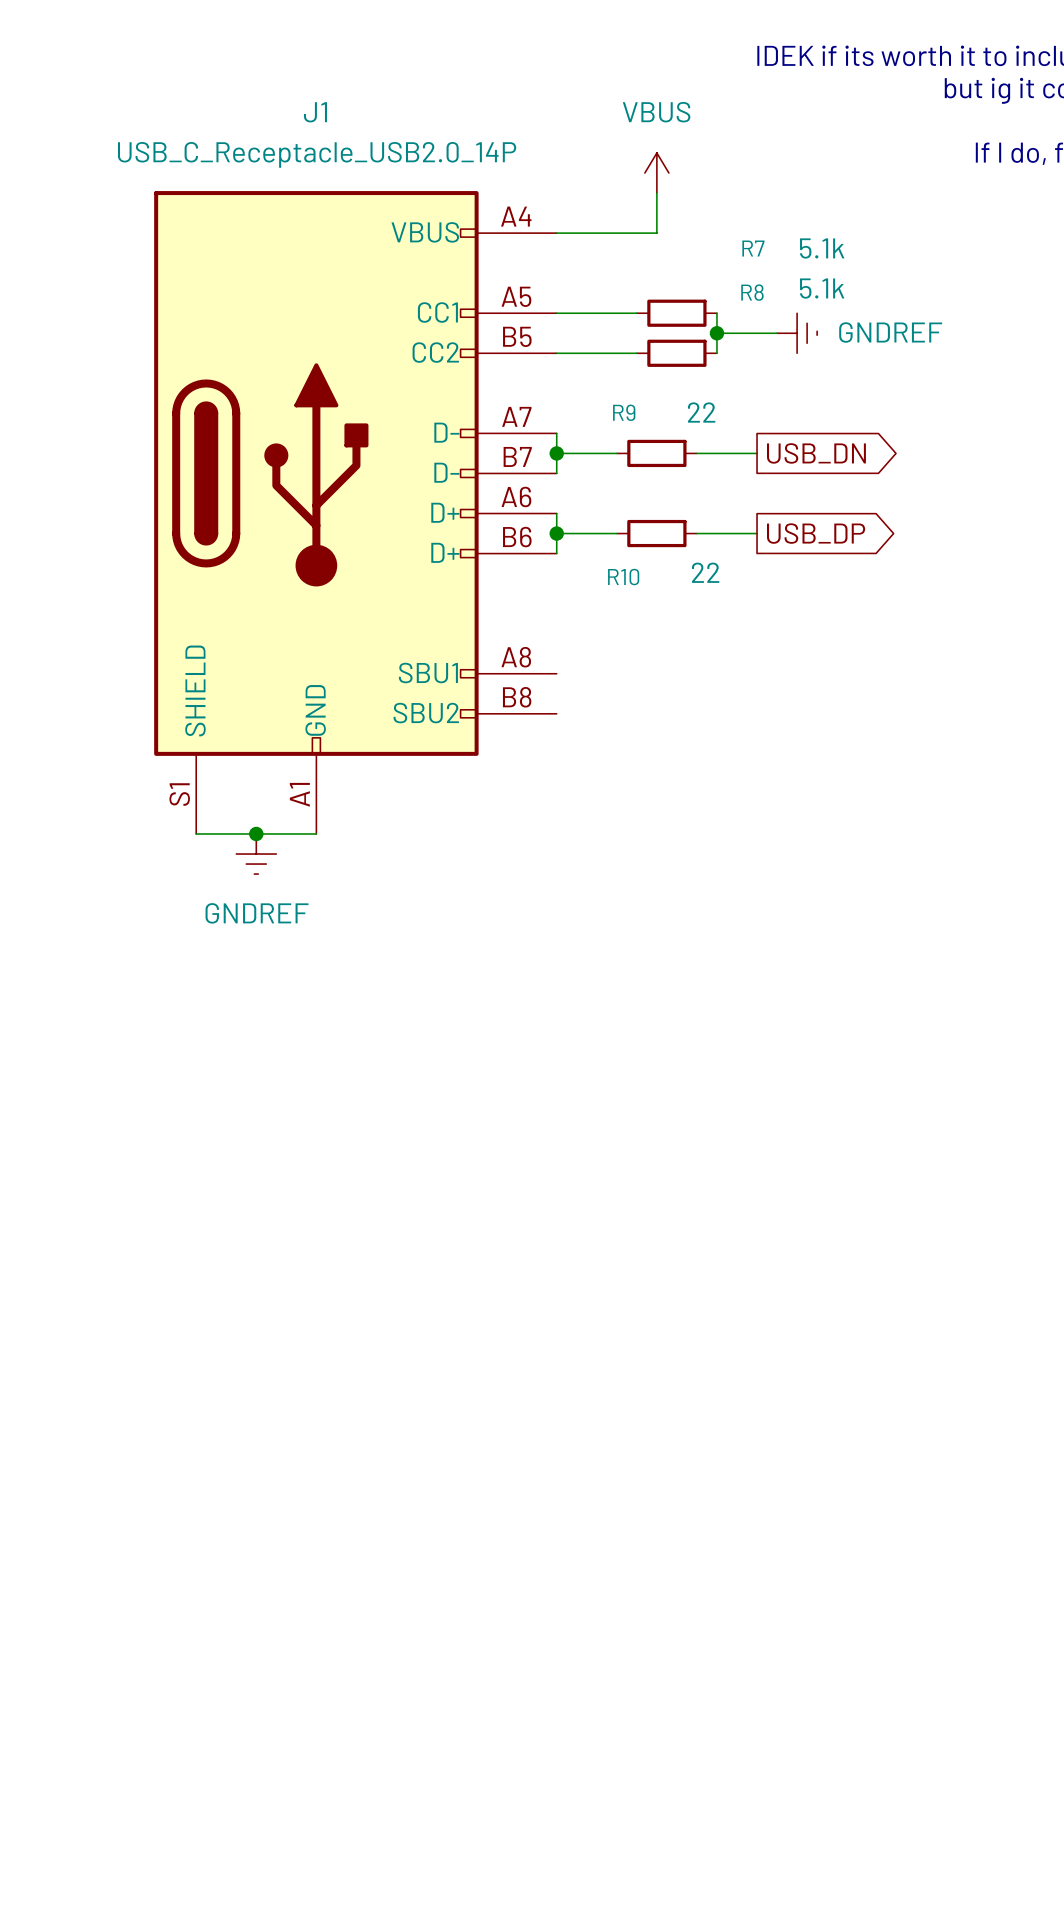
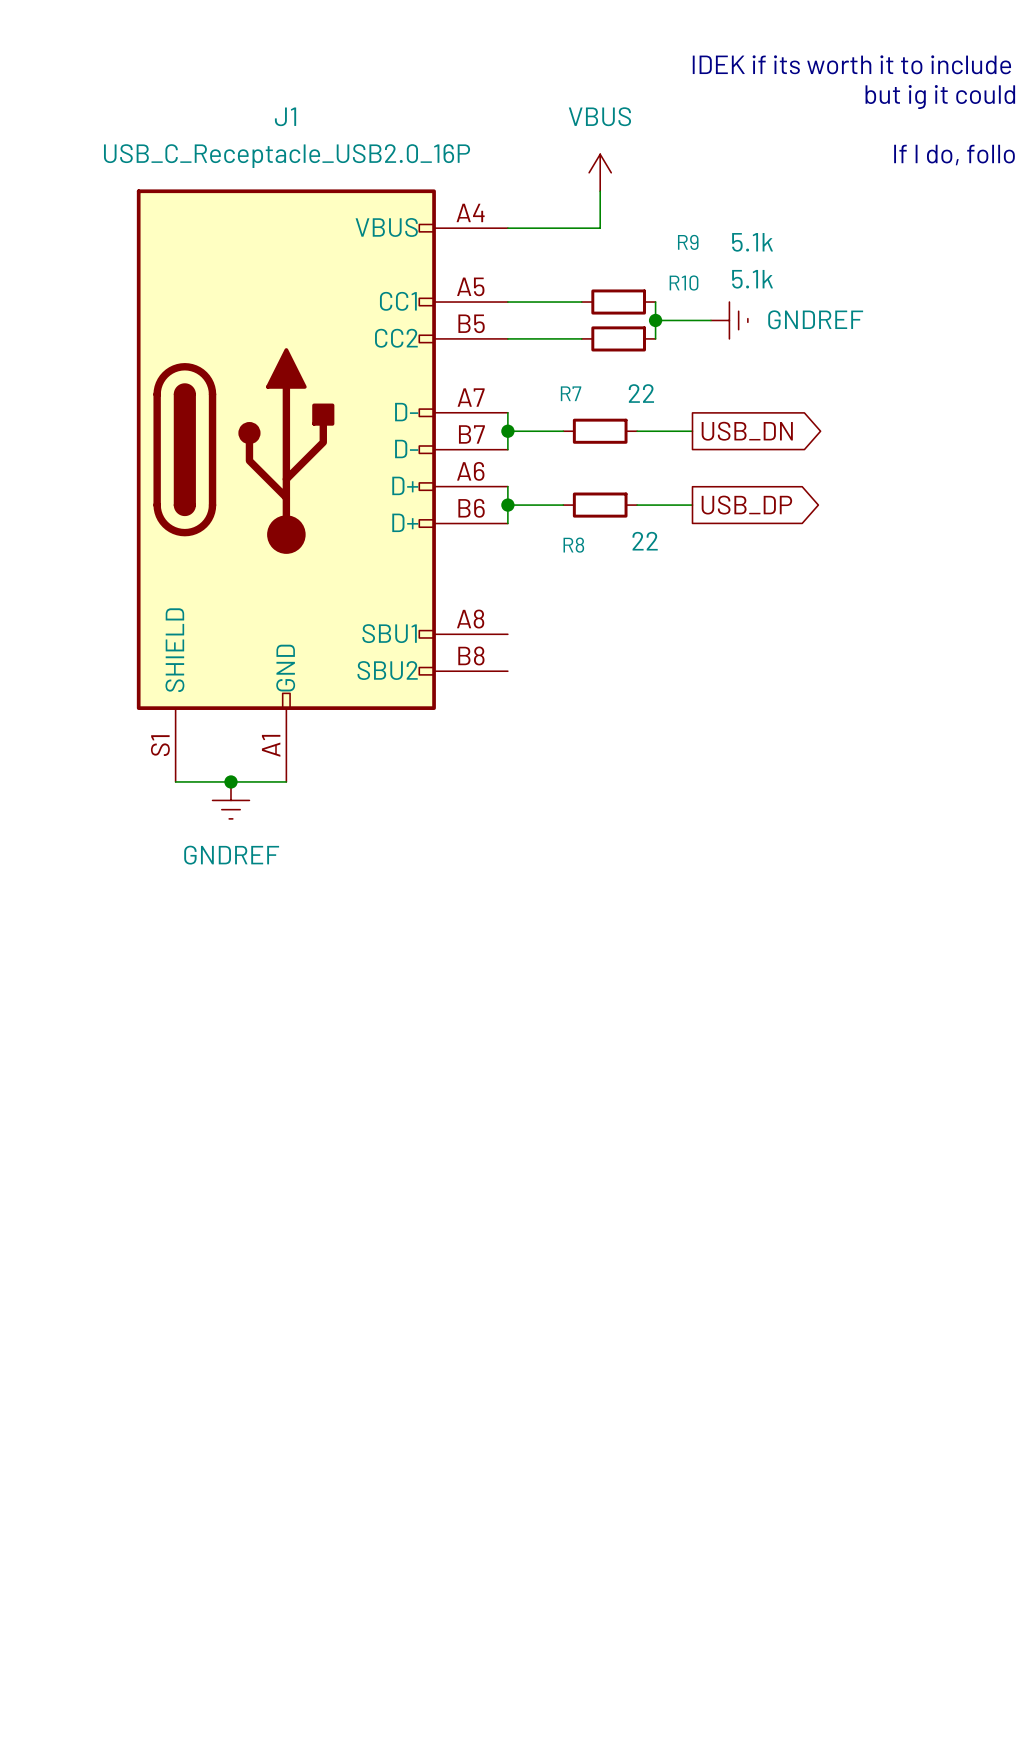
J1 value: USB_C_Receptacle_USB2.0_14P (317, 154) -> USB_C_Receptacle_USB2.0_16P (287, 156)
R7 name: R7 (753, 248) -> R9 (688, 242)
R8 name: R8 (752, 292) -> R10 (684, 283)
R9 name: R9 (624, 412) -> R7 (571, 393)
R10 name: R10 (623, 577) -> R8 (573, 545)

